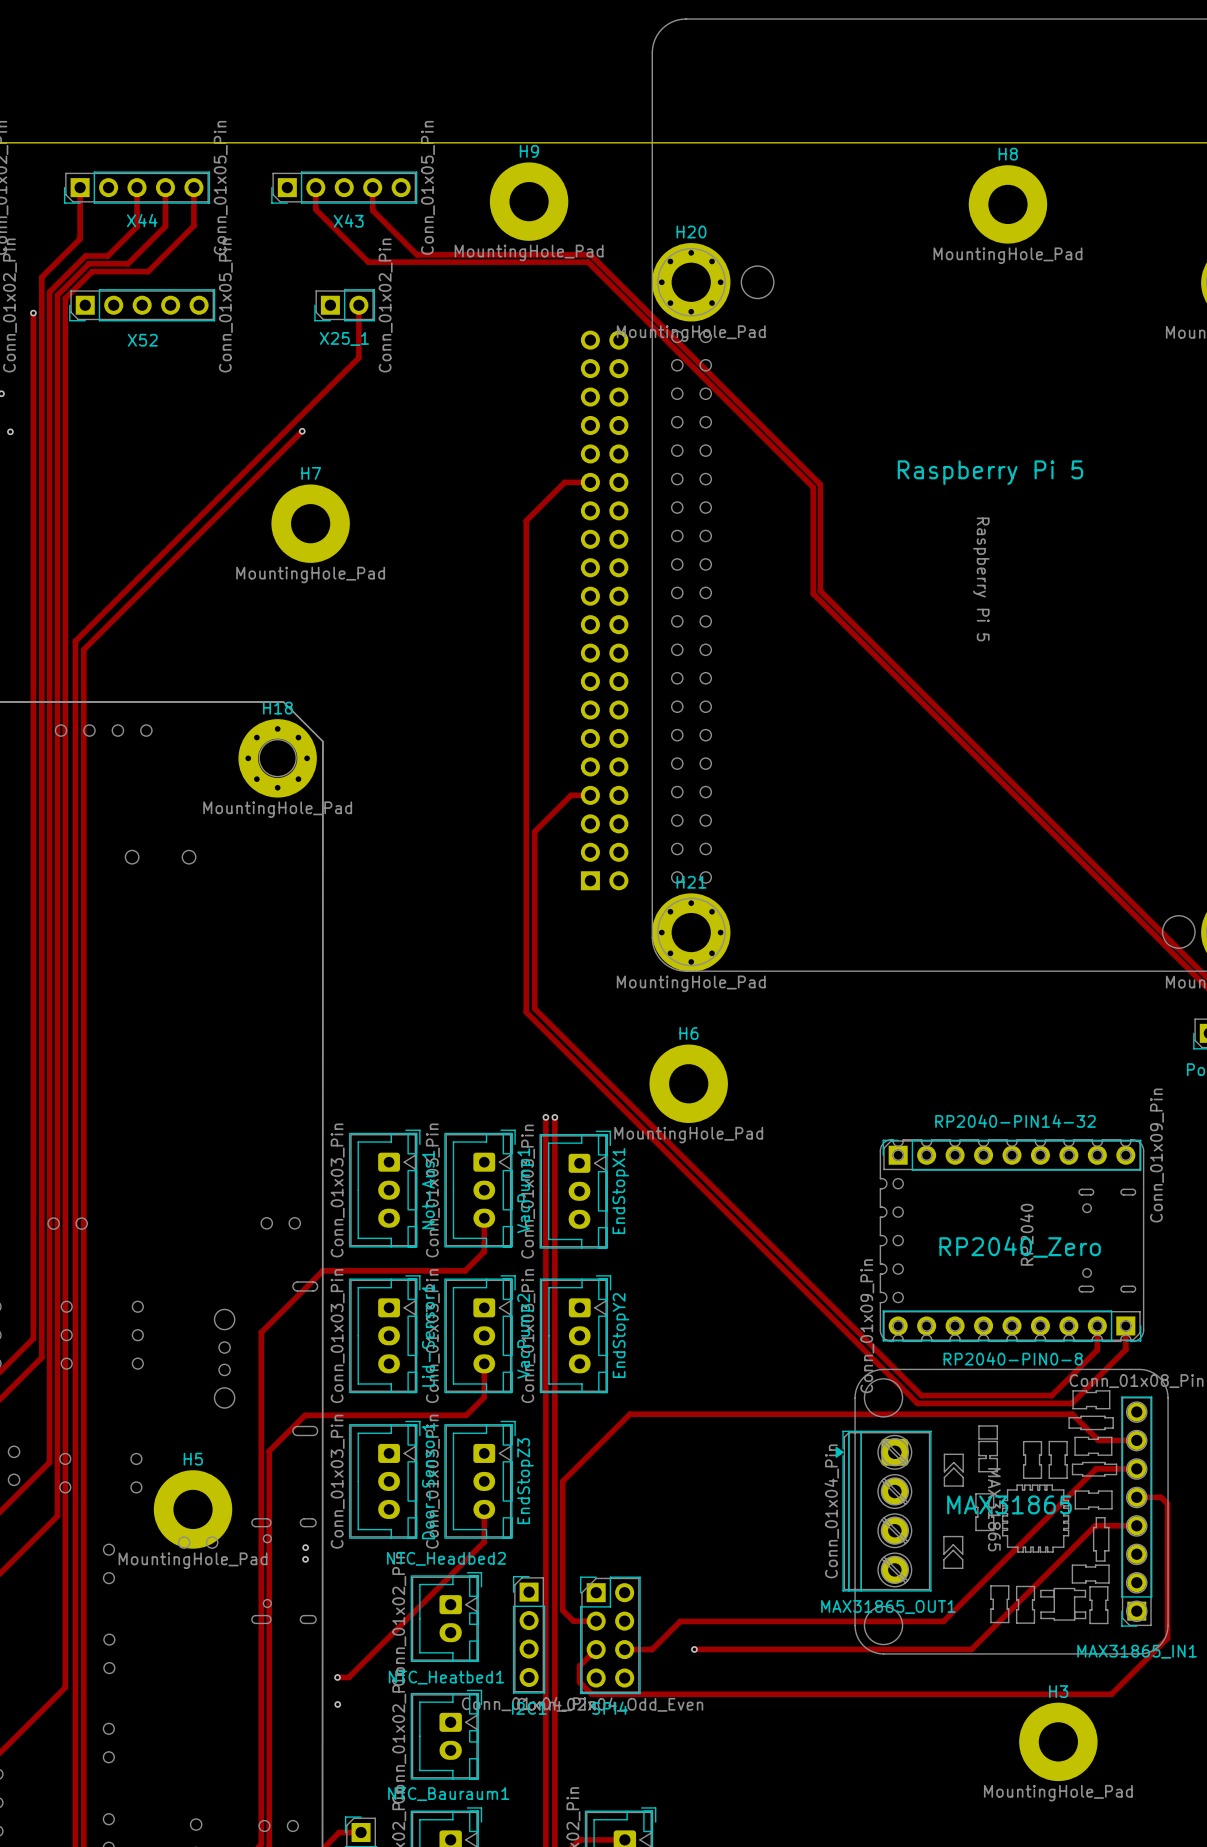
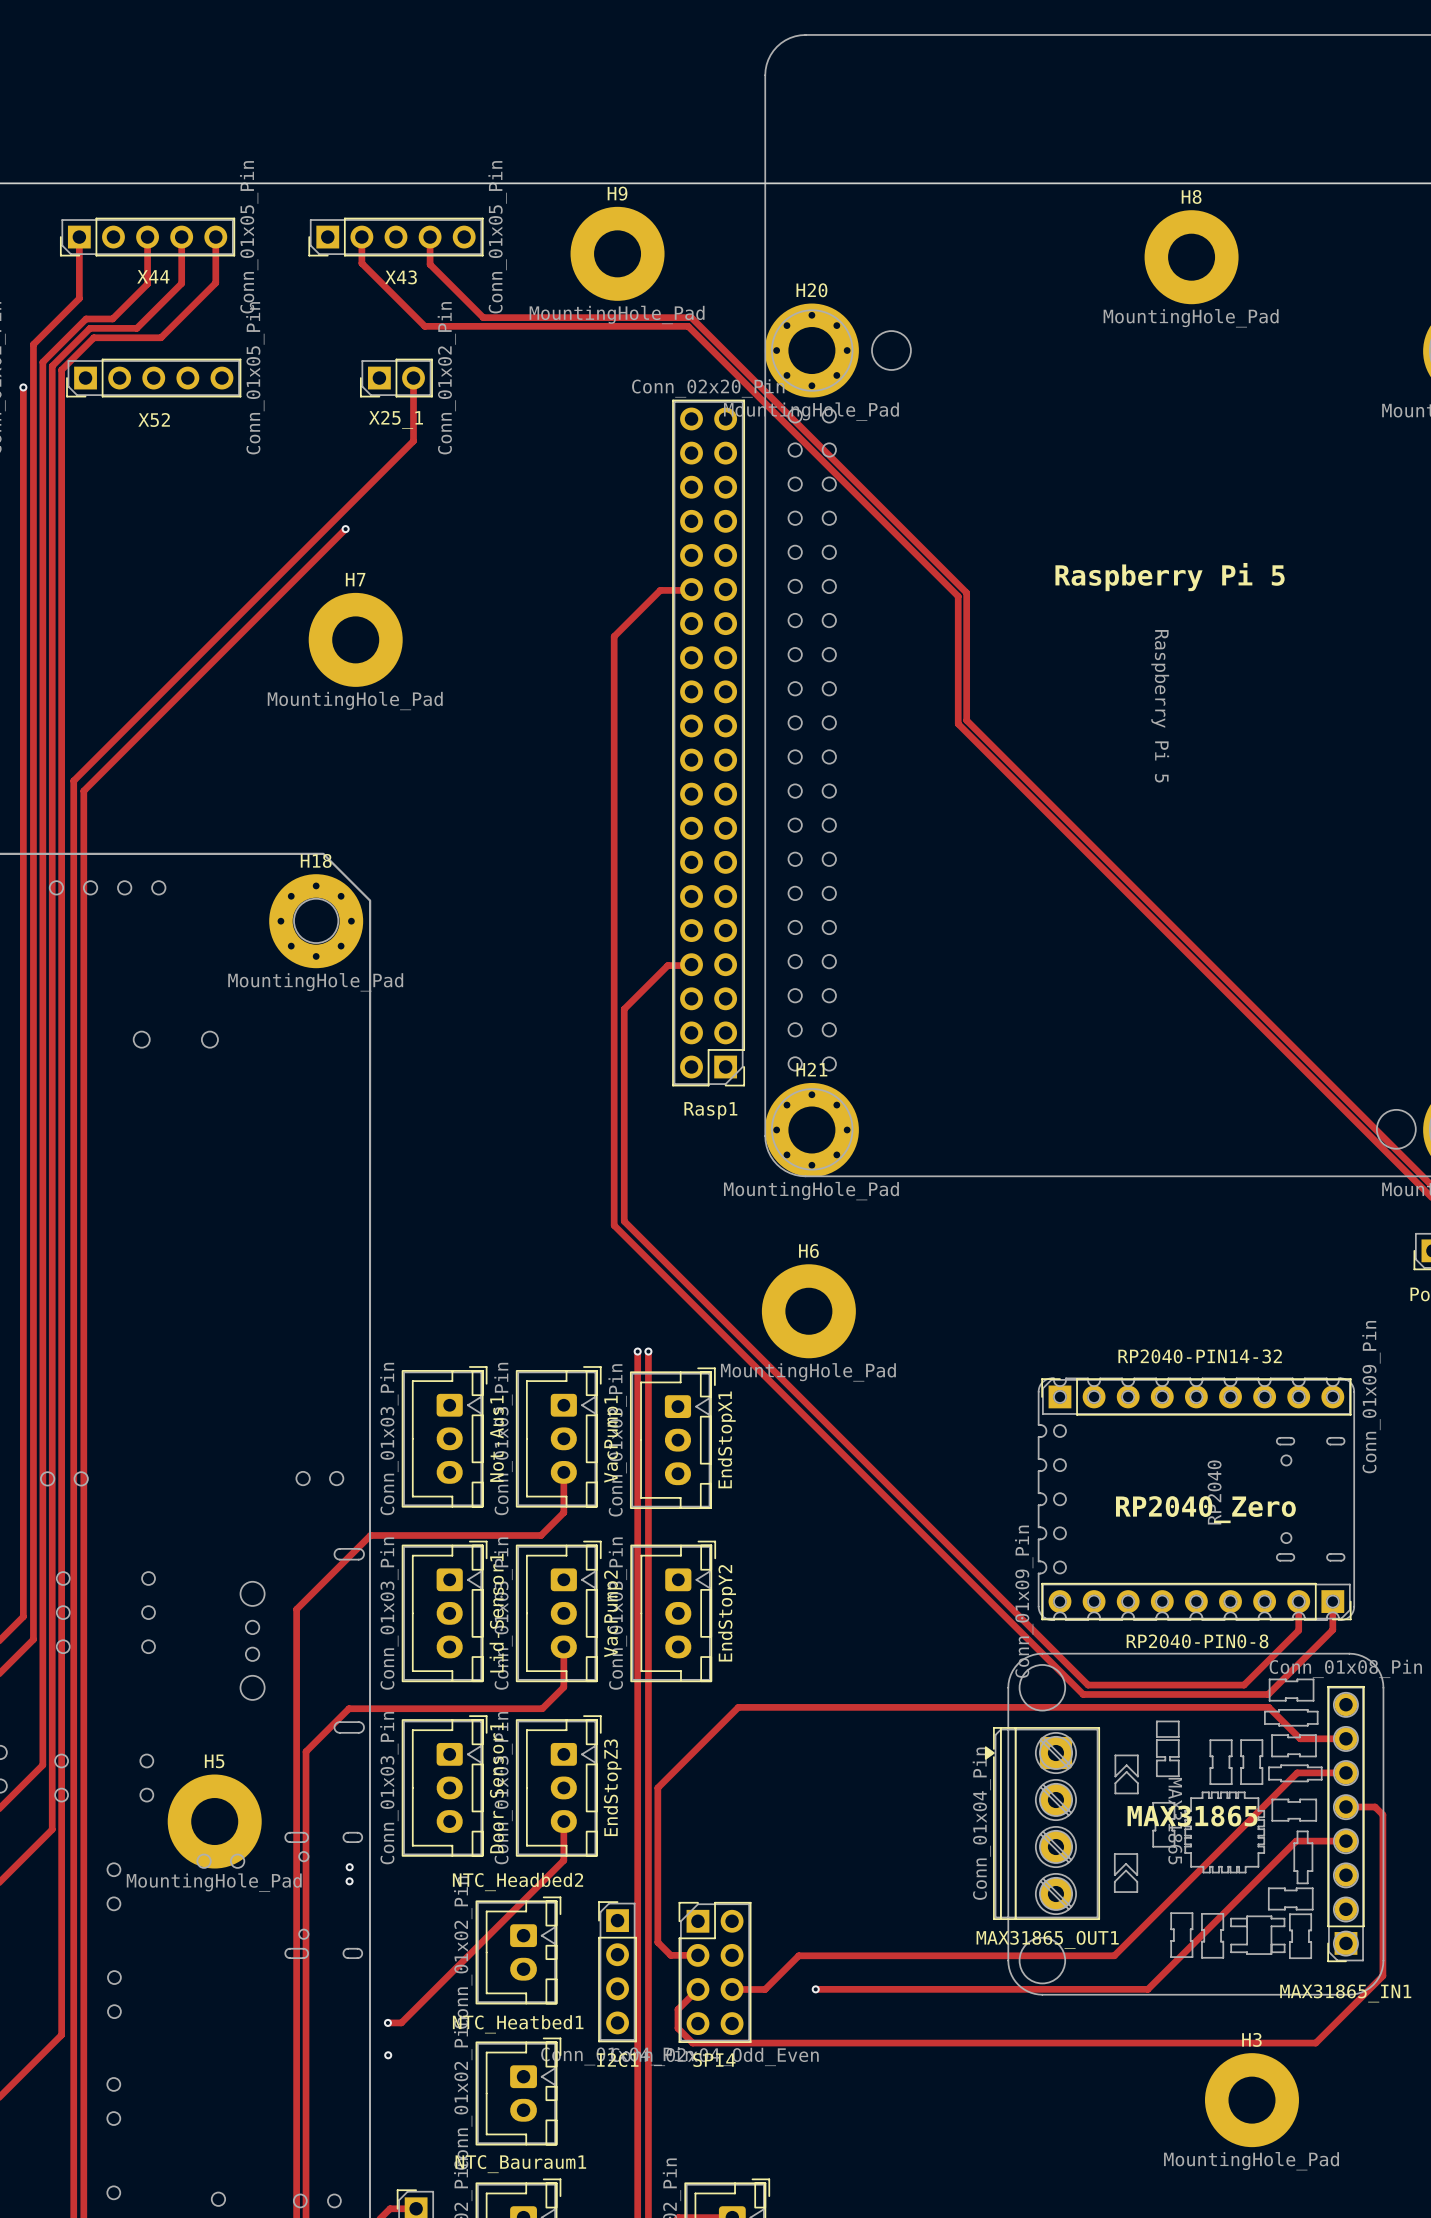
Rasp1 side: bottom (604, 610) -> top (708, 743)

